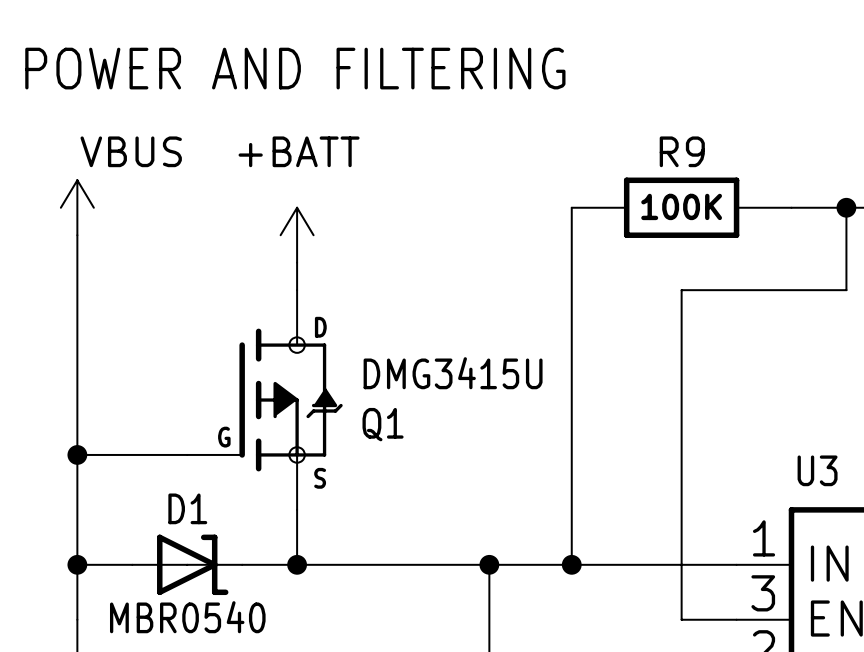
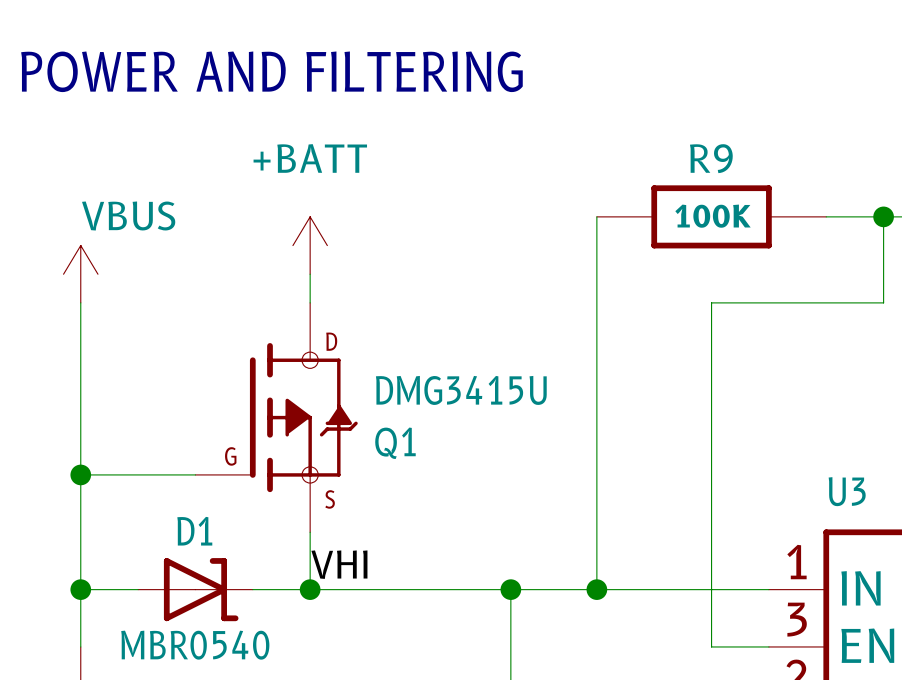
power symbol position: VBUS (77, 207) -> VBUS (80, 274)
label: none -> VHI (339, 564)

